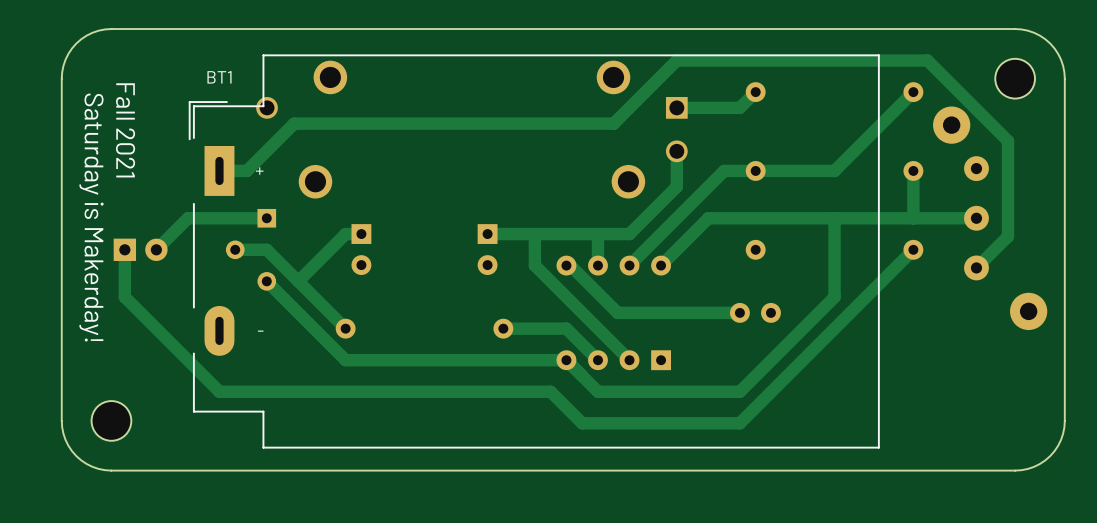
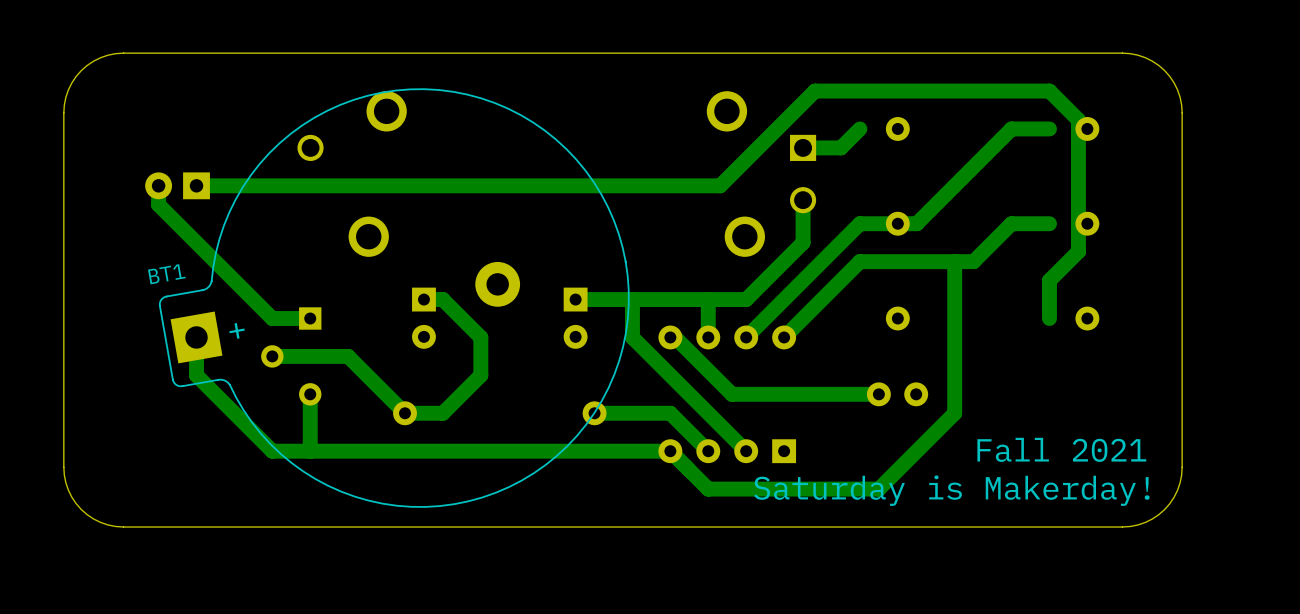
board edge: (942, 29) (1027, 30) (1039, 35) (1050, 43) (1058, 53) (1063, 65) (1064, 78) (1064, 427) (1061, 439) (1054, 451) (1045, 460) (1034, 466) (1015, 470) (104, 470) (92, 466) (81, 460) (72, 451) (65, 439) (61, 420) (61, 373) -> (1122, 53) (1145, 57) (1164, 70) (1177, 89) (1182, 112) (1181, 475) (1177, 490) (1169, 503) (1158, 514) (1145, 522) (1122, 527) (123, 527) (100, 522) (81, 509) (68, 490) (63, 467)
BT1 footprint: [188, 54, 880, 449] -> [158, 88, 630, 508]
track: (686, 60) (676, 60) (613, 123) (294, 123) (246, 170) (219, 170) -> (815, 91) (720, 185) (196, 185)
track: (881, 60) (927, 60) (1008, 141) (1008, 236) (976, 267) -> (1049, 91) (1078, 120) (1078, 251) (1049, 280) (1049, 318)
BT1 name position: BT1 (219, 77) -> BT1 (166, 274)
part: (1015, 78) -> none
track: (755, 92) (739, 107) (708, 107) -> (859, 128) (840, 147)
track: (913, 92) (834, 170) (771, 170) -> (1049, 128) (1011, 128) (916, 223)
text: Fall 2021 (125, 130) -> none
track: none -> (158, 185) (158, 204) (272, 318)
track: (913, 170) (913, 218) -> none
text: Saturday is Makerday! (91, 217) -> none
track: (266, 218) (187, 218) (156, 249) -> none
track: (834, 218) (834, 297) (803, 328) -> (954, 261) (954, 413)
track: (976, 218) (708, 218) -> (1049, 223) (1011, 223) (973, 261) (859, 261) (840, 280)
part: (990, 218) -> none
track: (361, 234) (345, 234) (298, 281) (266, 249) -> (423, 299) (442, 299) (480, 337) (480, 375) (442, 413) (405, 413)
part rotation: 0° (140, 249) -> 180° (177, 185)
part position: (140, 249) -> (177, 185)
part position: (251, 249) -> (291, 356)
track: (913, 249) (739, 423) (582, 423) (550, 391) (219, 391) (124, 297) (124, 249) -> none
track: (266, 281) (345, 360) -> (196, 337) (196, 375) (272, 451) (405, 451)
track: none -> (348, 356) (272, 356)
track: none -> (310, 394) (310, 451)
text: none -> Fall 2021 (1061, 449)
text: none -> Saturday is Makerday! (951, 490)
part: (111, 420) -> none

